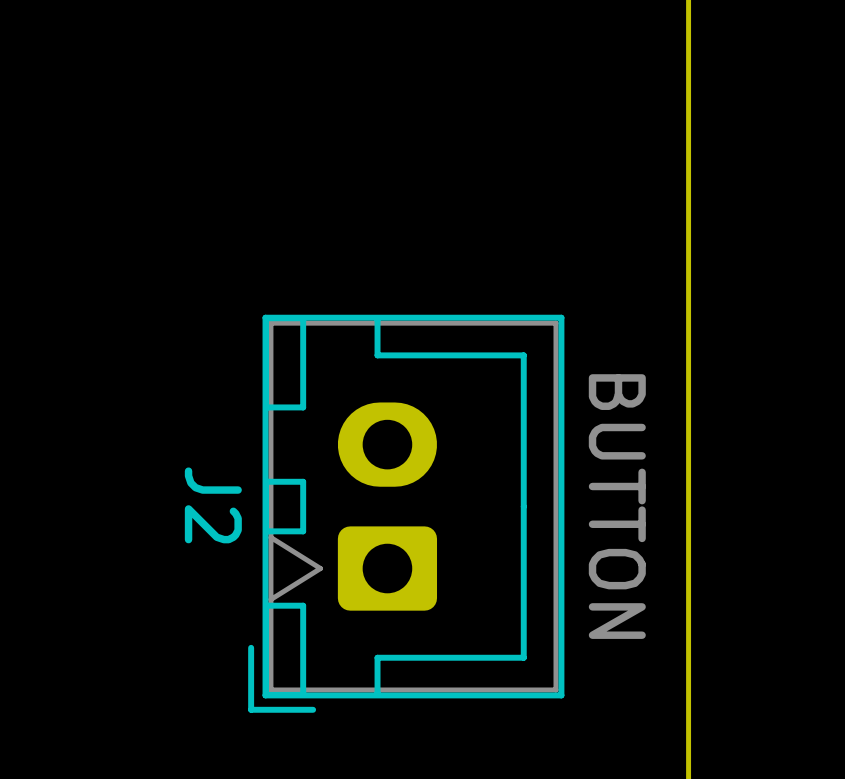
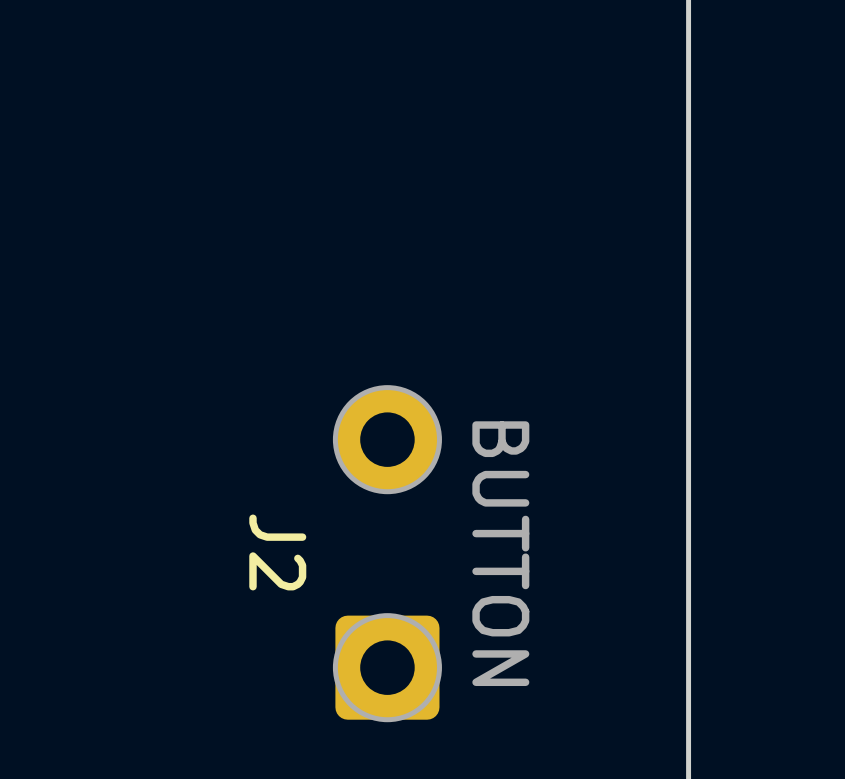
J2 footprint: [248, 314, 565, 713] -> [332, 385, 442, 723]

